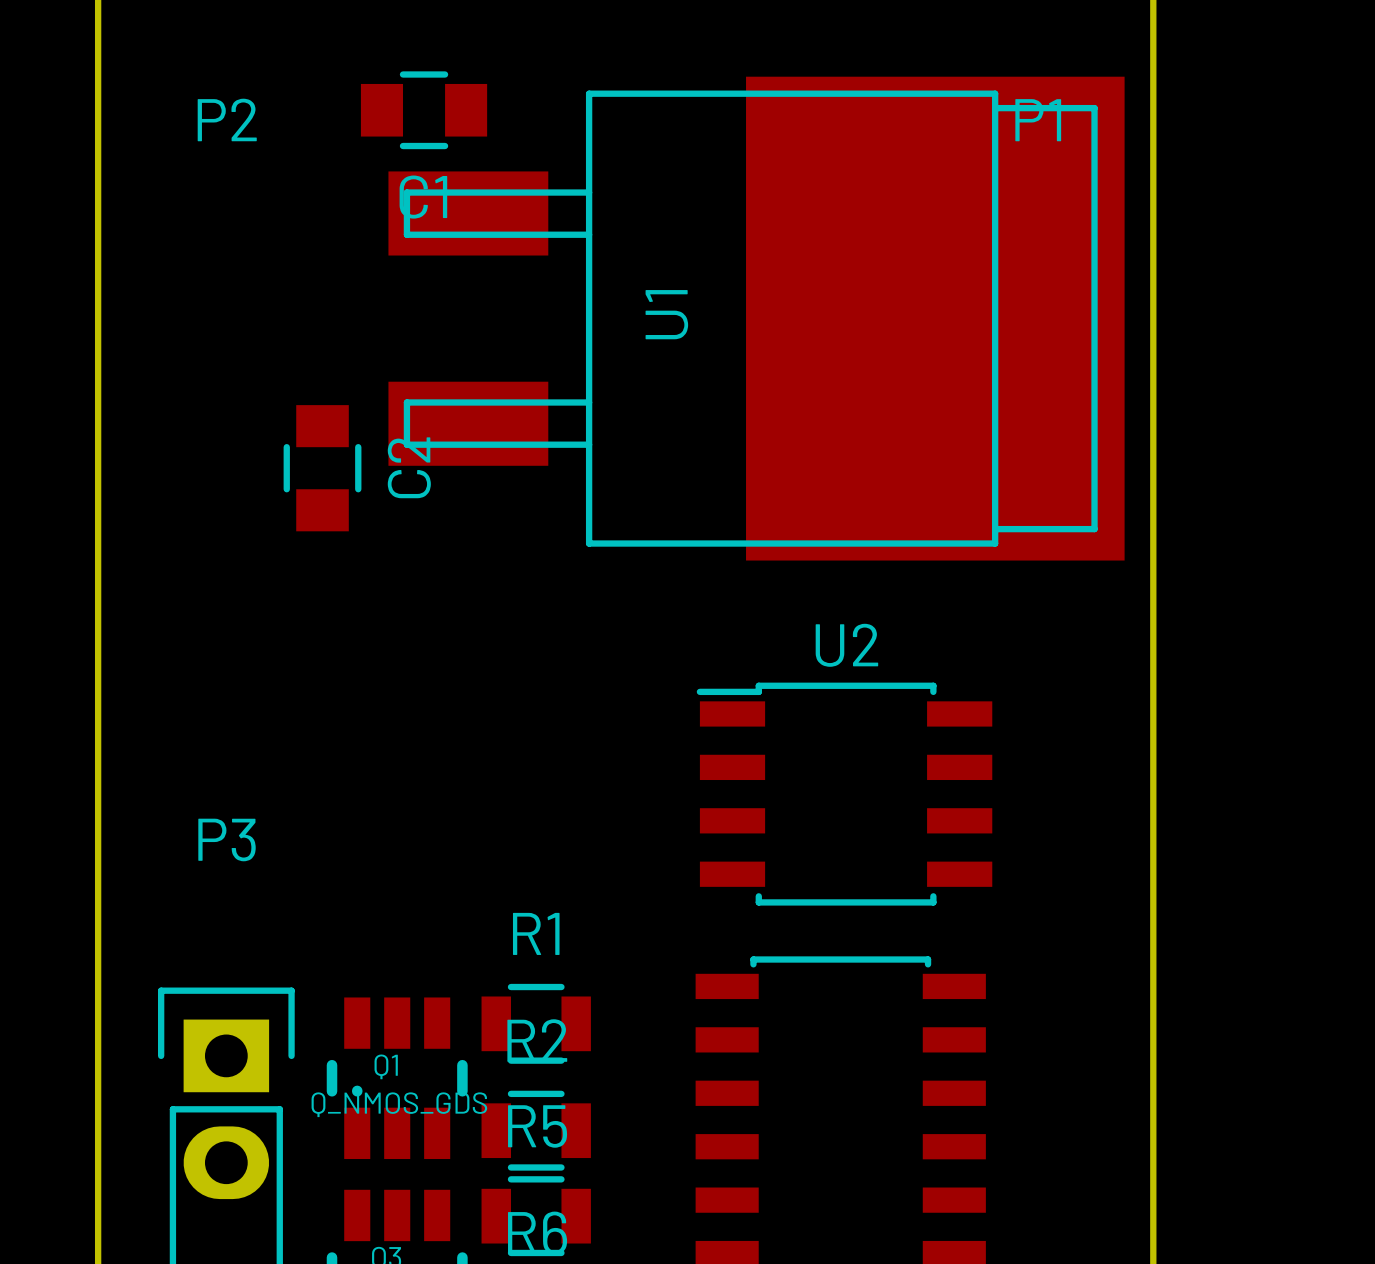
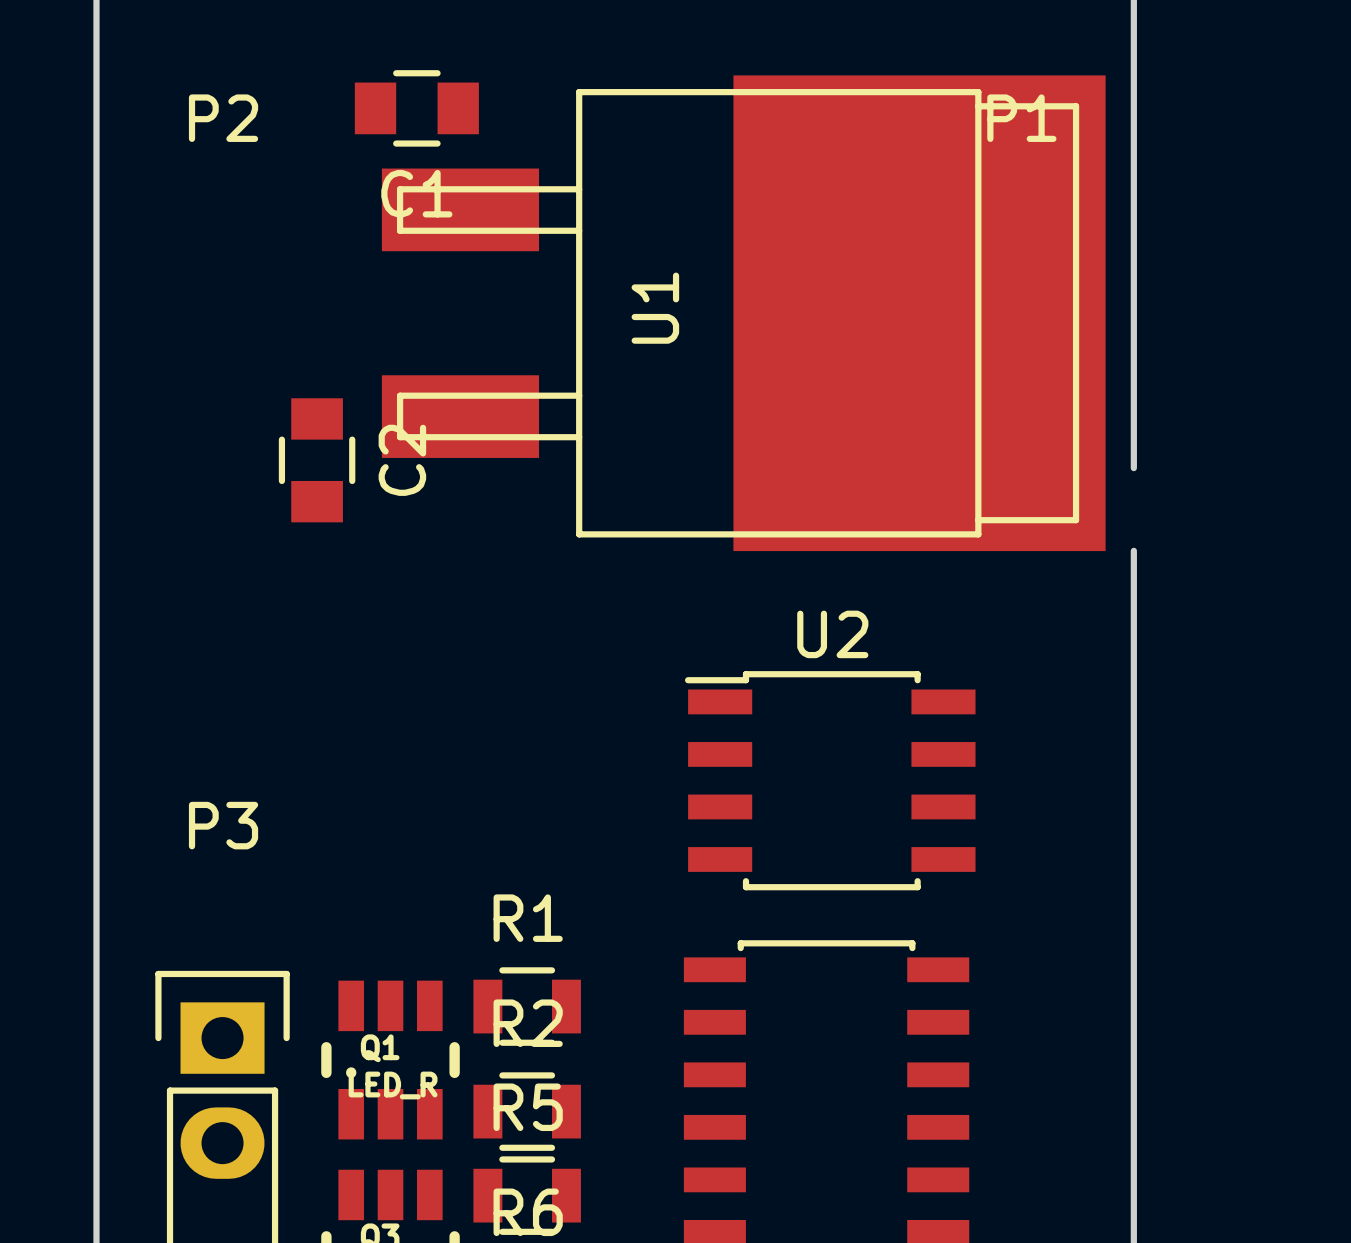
board edge: (1153, 476) (1153, 560) -> none
Q1 value: Q_NMOS_GDS (399, 1104) -> LED_R (393, 1085)

